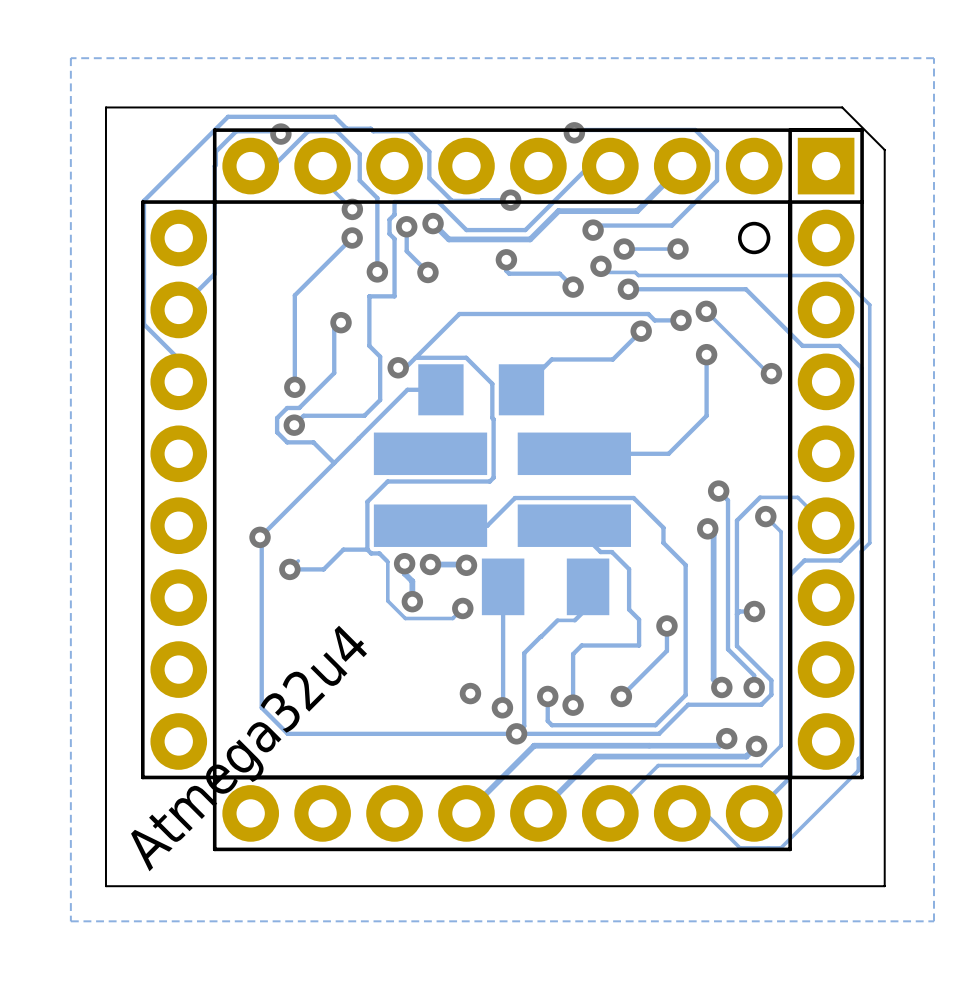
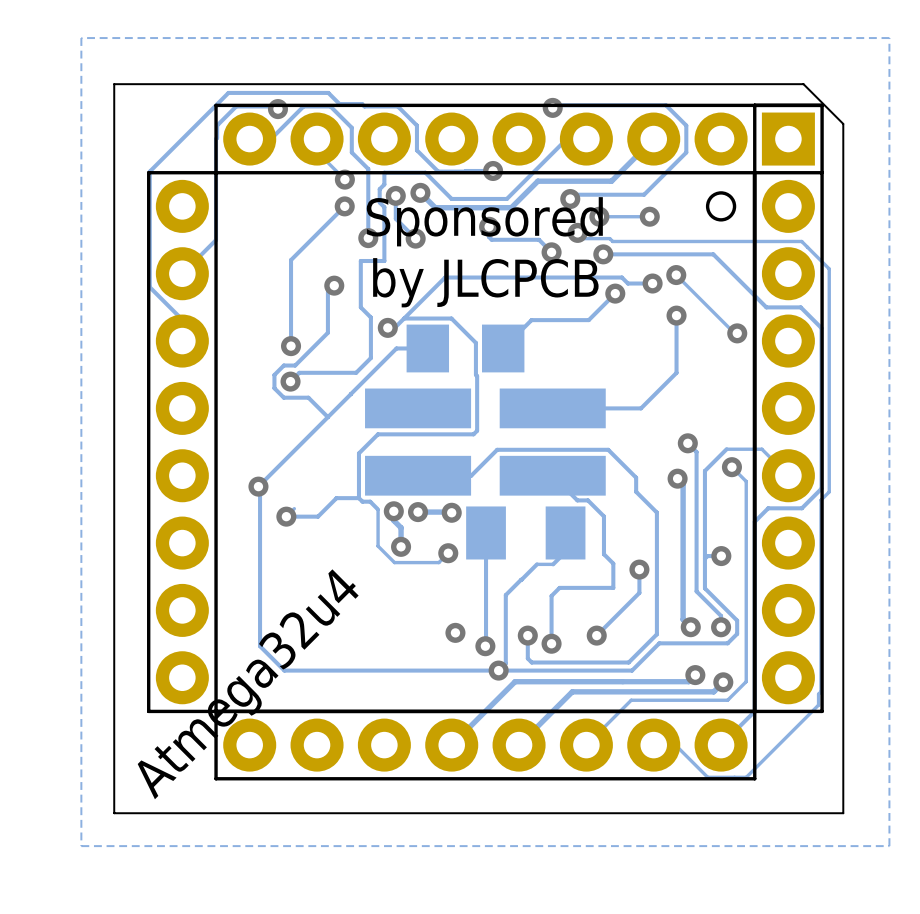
text: none -> Sponsored (484, 221)
text: none -> by JLCPCB (485, 282)

